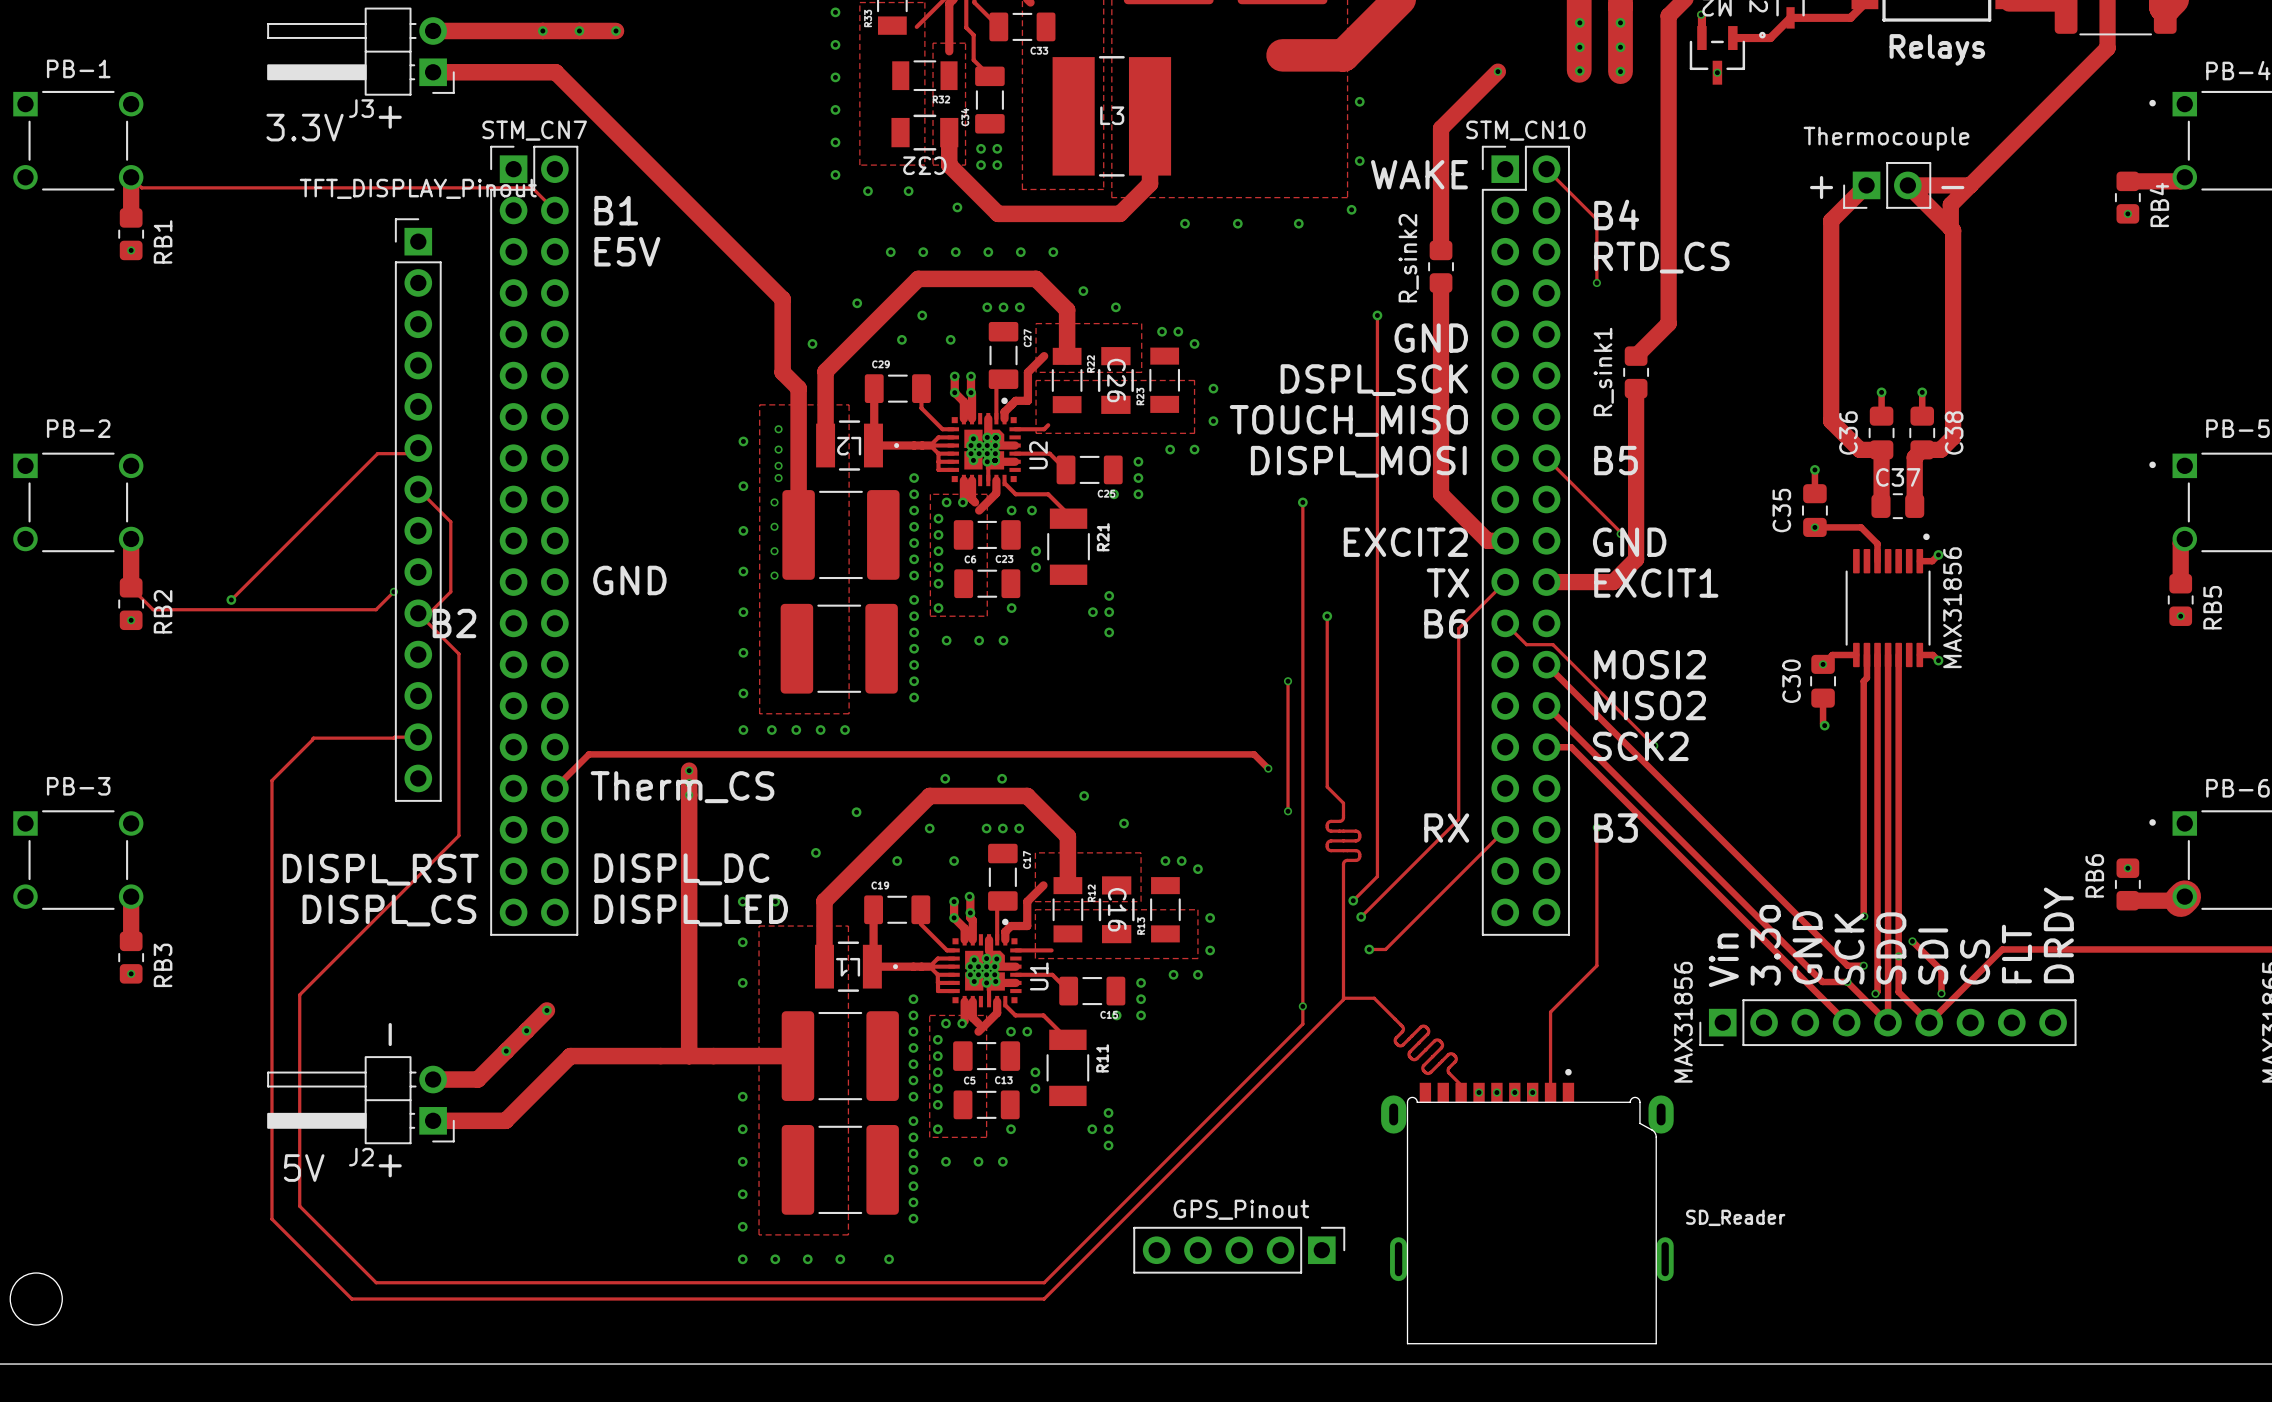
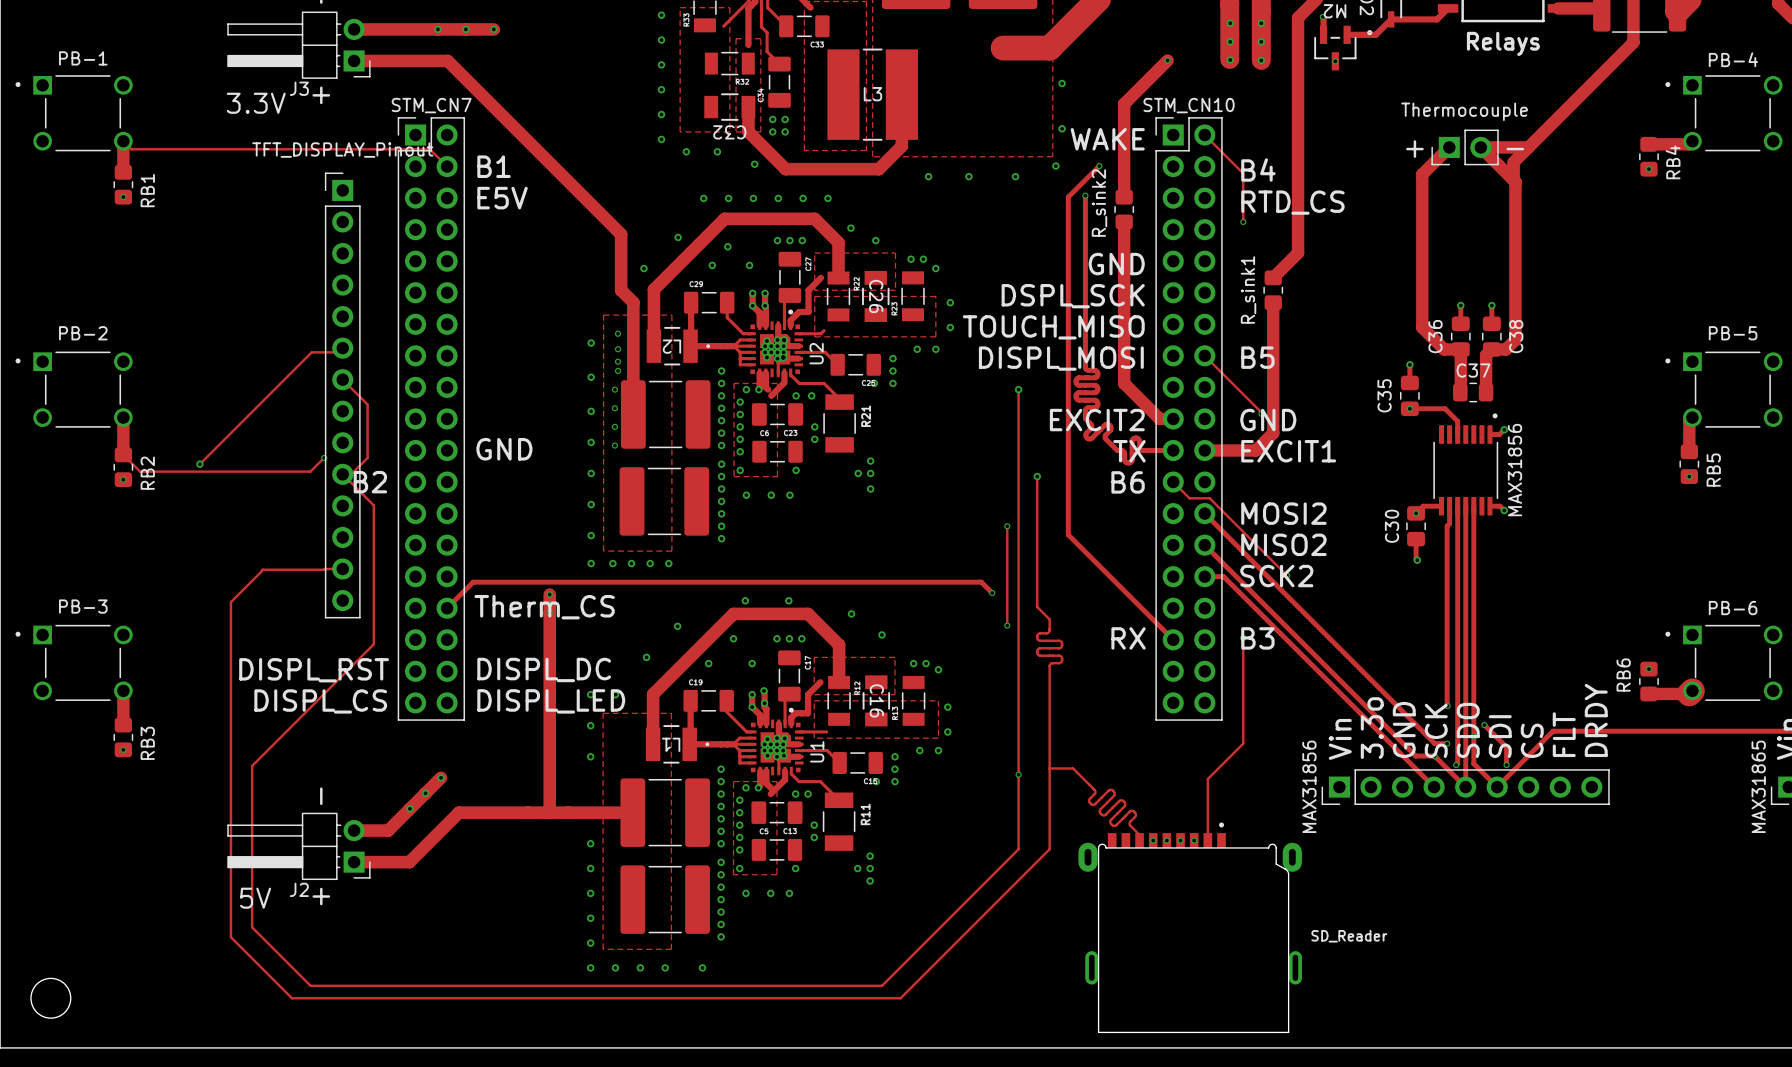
via: none -> (1099, 166)
via: none -> (1085, 195)
track: (1377, 315) (1377, 876) (1353, 900) -> none
via: (1377, 315) -> none
track: (1505, 582) (1458, 628) (1458, 819) (1361, 916) -> (1173, 450) (1141, 450) (1139, 439) (1134, 438) (1132, 440) (1132, 460) (1127, 462) (1124, 460) (1123, 451) (1117, 450) (1105, 438) (1111, 428) (1108, 424) (1105, 424) (1090, 438) (1085, 436) (1091, 426) (1085, 418) (1085, 409) (1096, 407) (1097, 402) (1095, 400) (1078, 400) (1076, 395) (1078, 392) (1095, 392) (1097, 387) (1095, 385) (1078, 385) (1076, 380) (1078, 377) (1095, 377) (1097, 373) (1096, 370) (1087, 370) (1085, 367) (1085, 195)
track: (1505, 829) (1385, 949) (1369, 949) -> (1173, 639) (1068, 534) (1068, 197) (1099, 166)
via: (1353, 900) -> none
via: (1361, 916) -> none
via: (1369, 949) -> none
track: (1343, 999) (1044, 1299) -> (1049, 769) (1049, 849) (900, 998) (820, 998)
track: (1302, 1024) (1044, 1282) -> (1018, 788) (1018, 849) (881, 985) (820, 985)
GPS_Pinout: (1239, 1250) -> none

